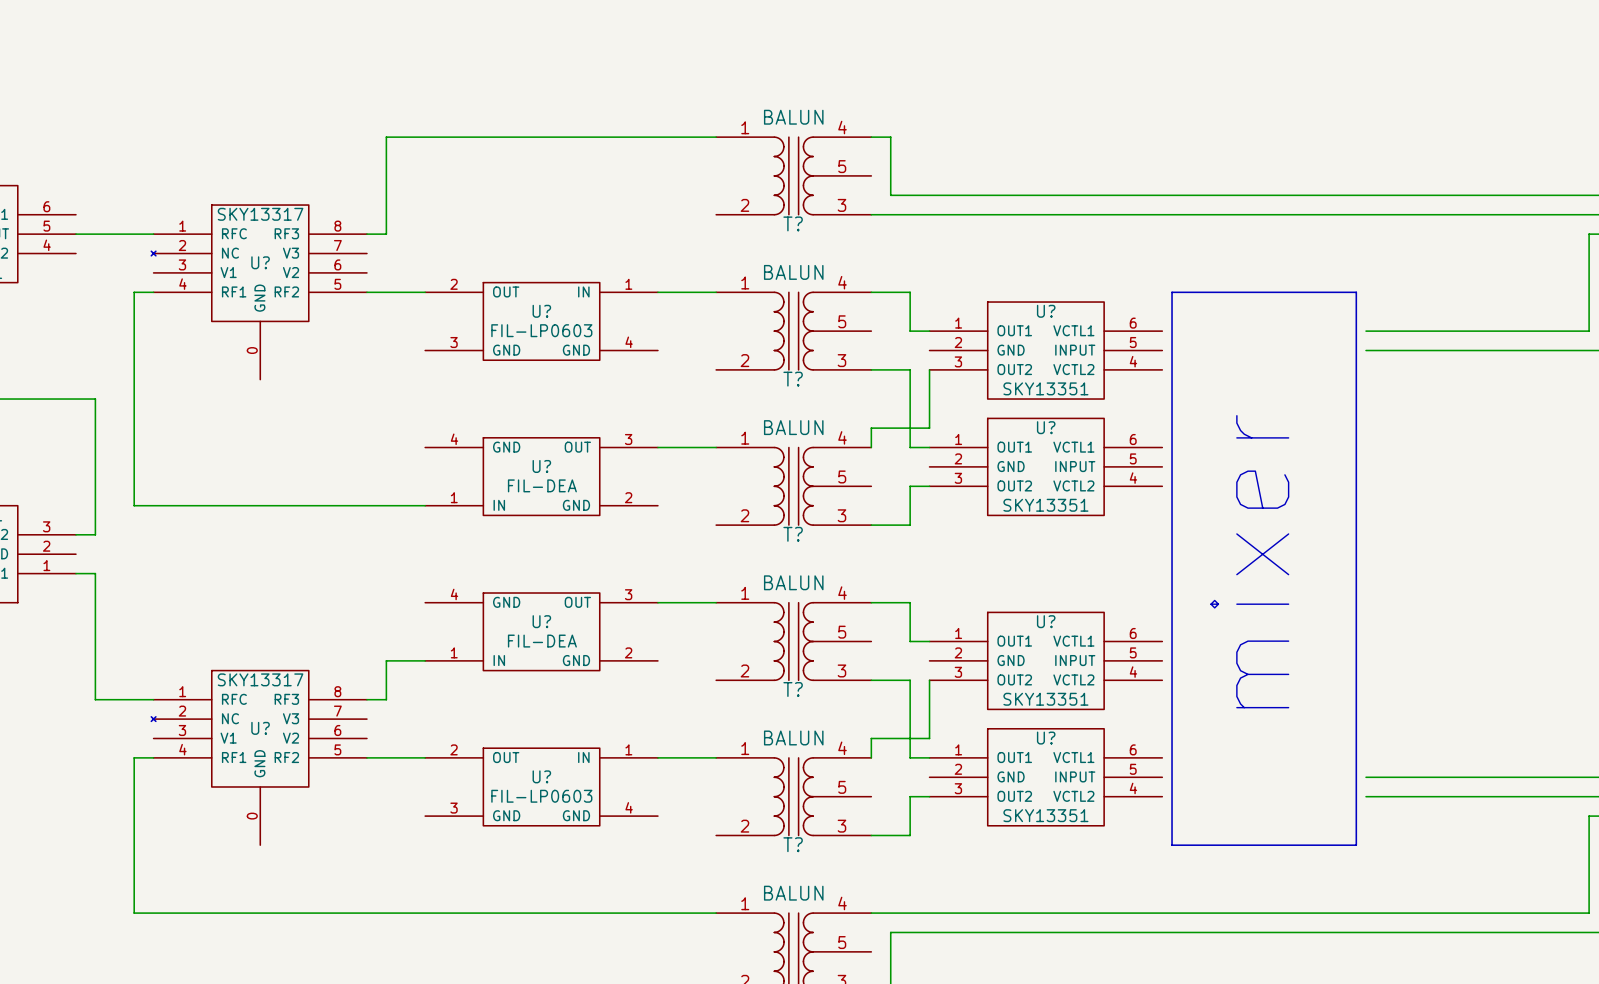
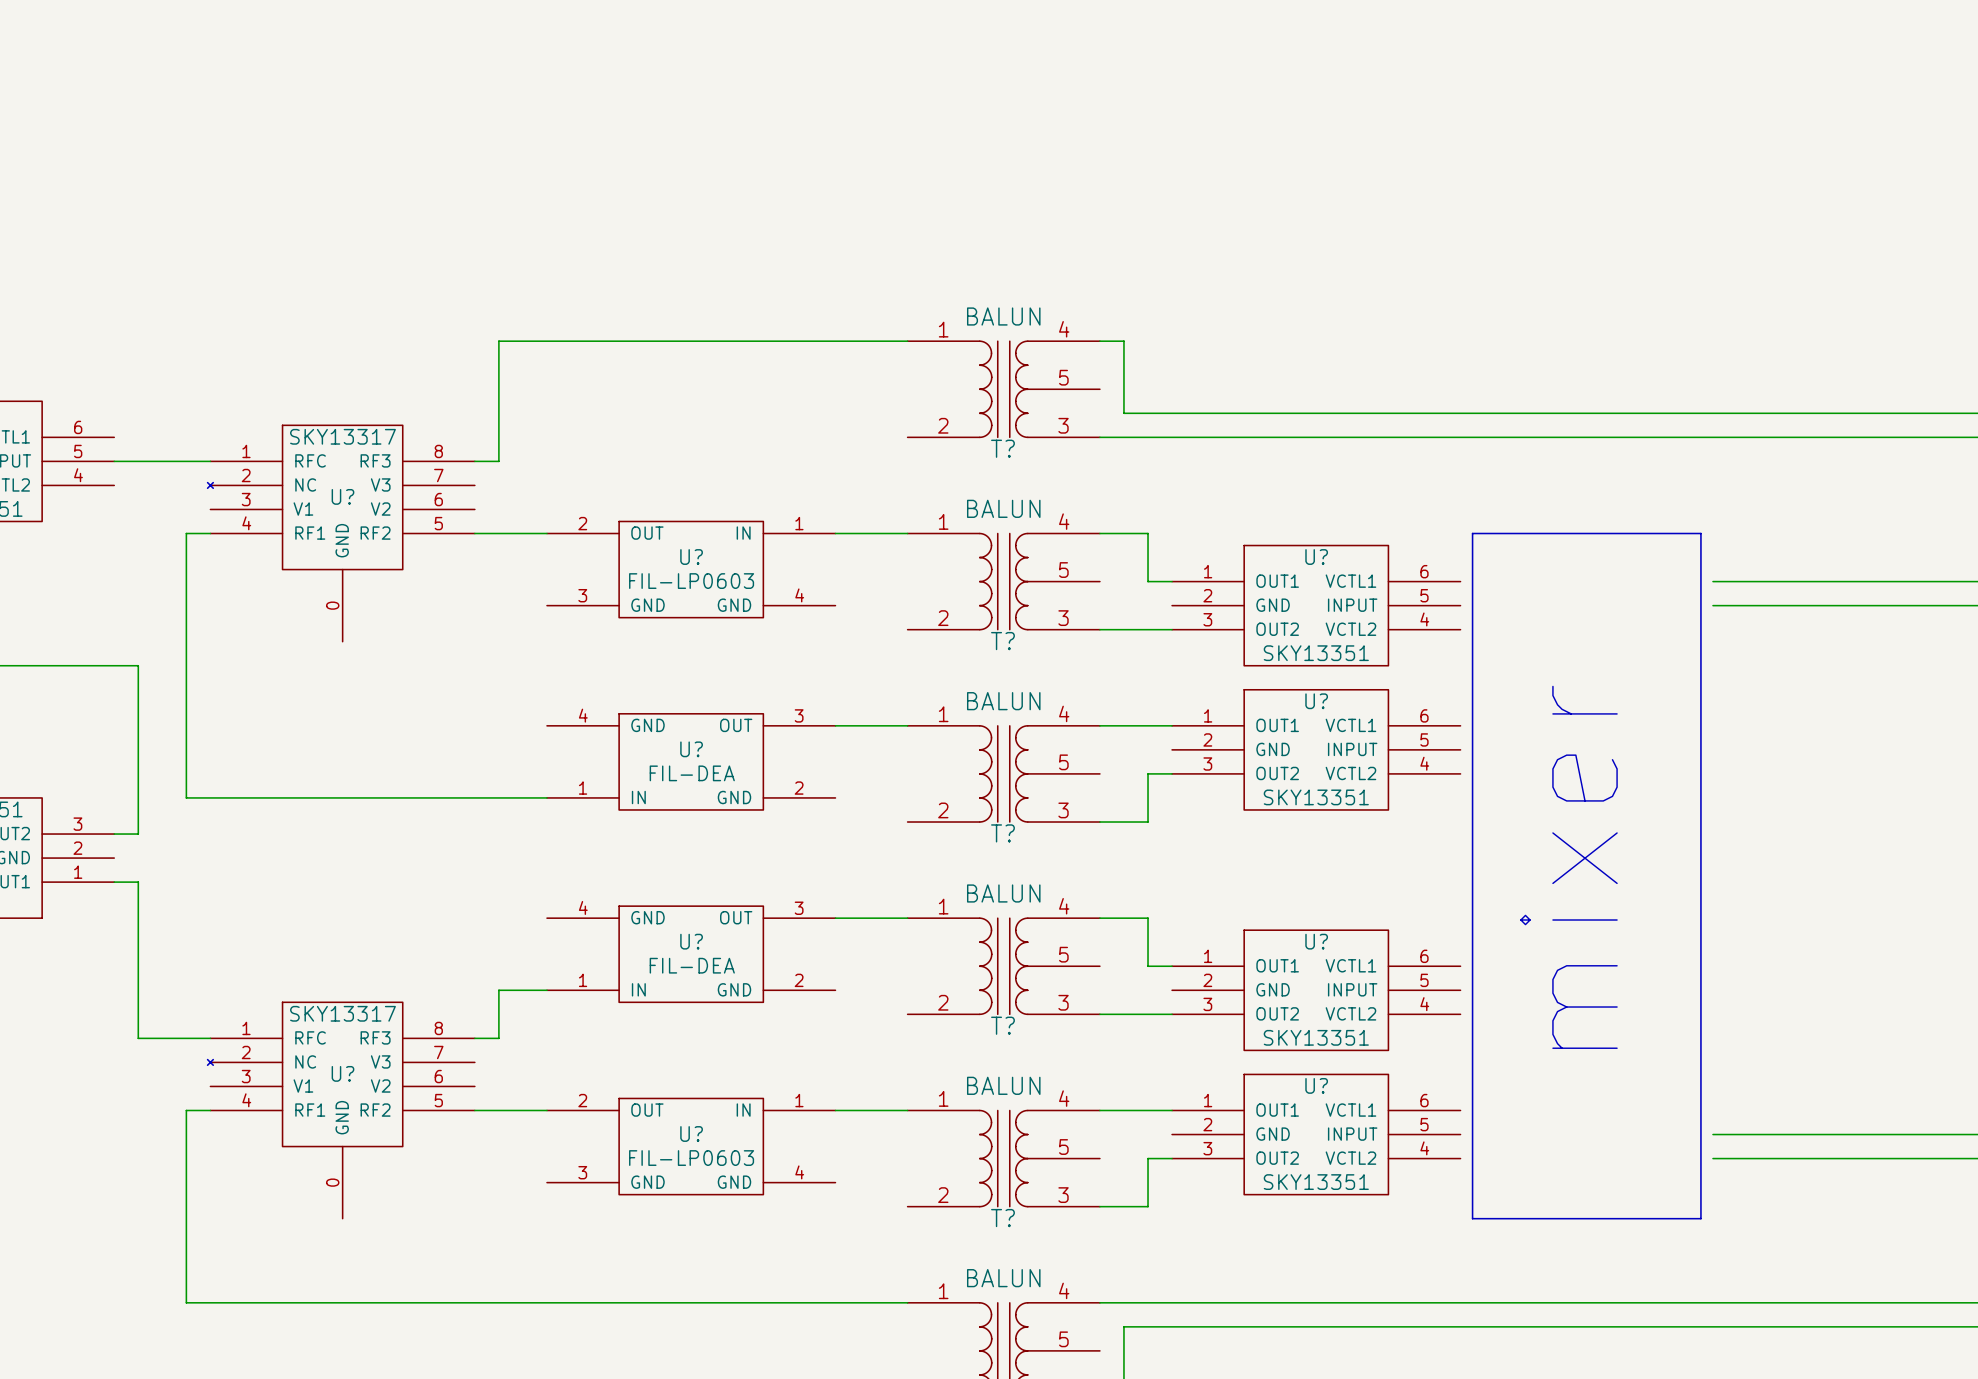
wire: (910, 369) (910, 447) -> (1148, 629) (1172, 629)
wire: (929, 369) (929, 428) (871, 428) (871, 447) -> (1148, 725) (1099, 725)
wire: (910, 680) (910, 757) -> (1148, 1014) (1172, 1014)
wire: (929, 680) (929, 738) (871, 738) (871, 757) -> (1148, 1110) (1099, 1110)

